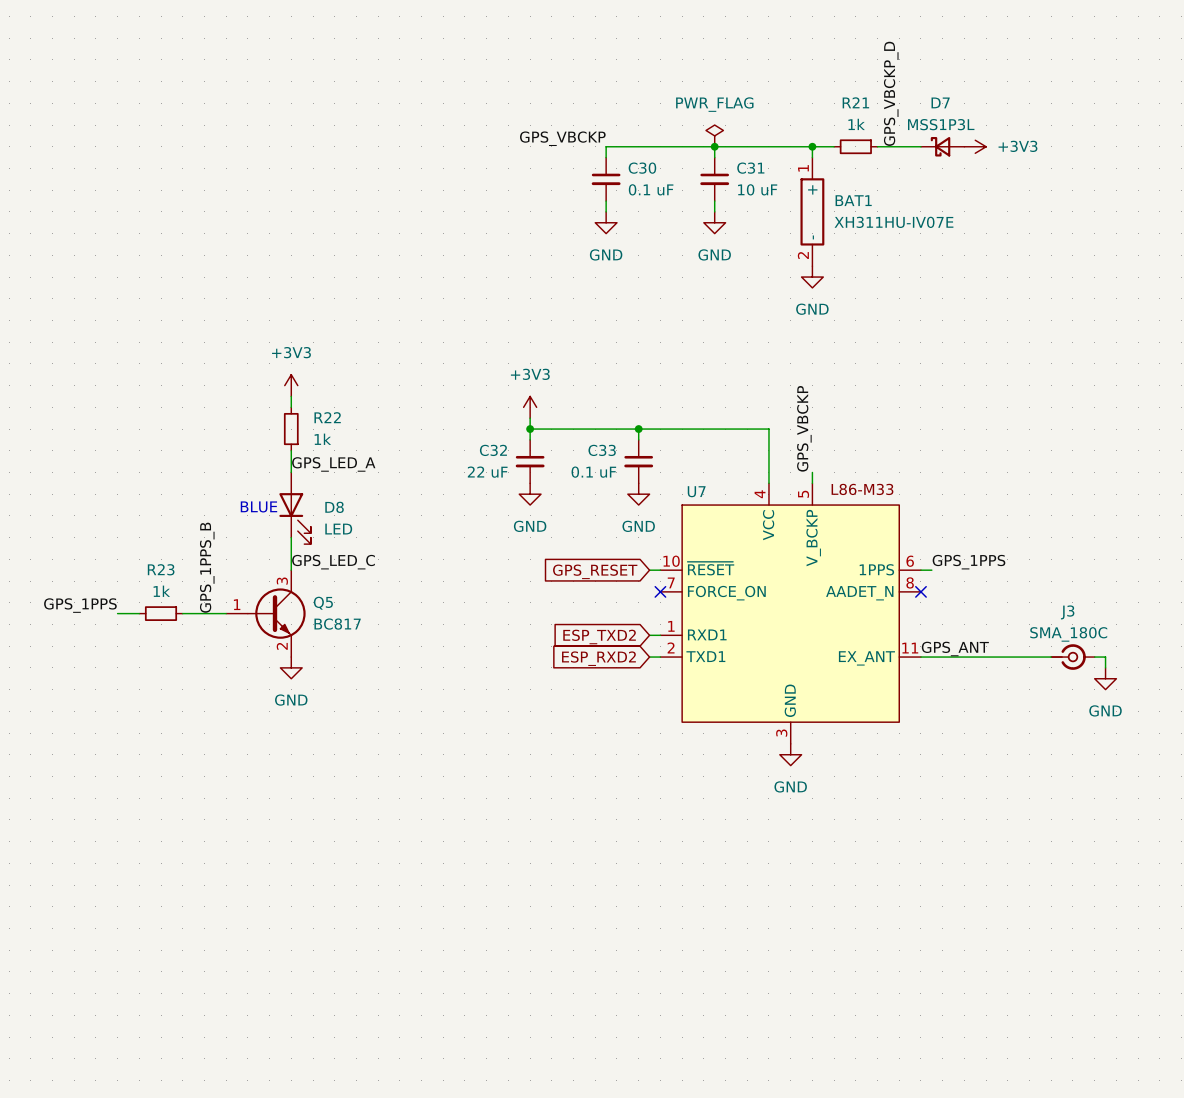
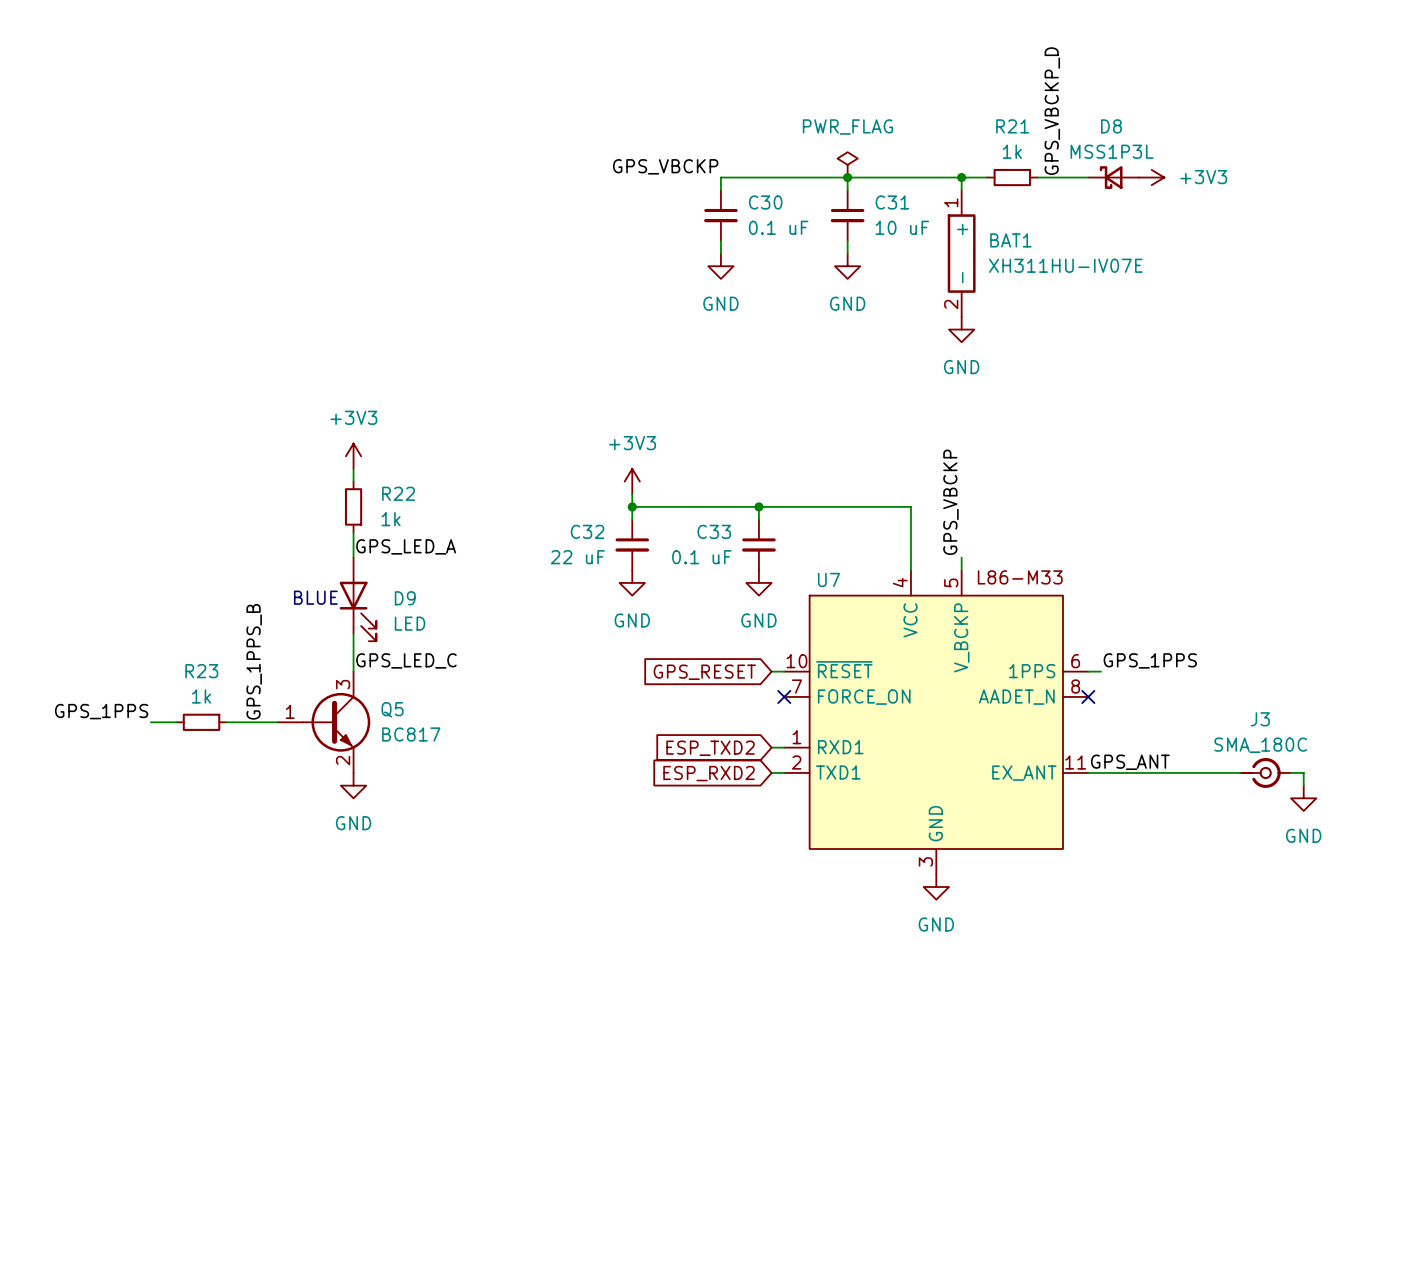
D7 name: D7 (940, 102) -> D8 (1111, 126)
D8 name: D8 (334, 507) -> D9 (405, 598)

